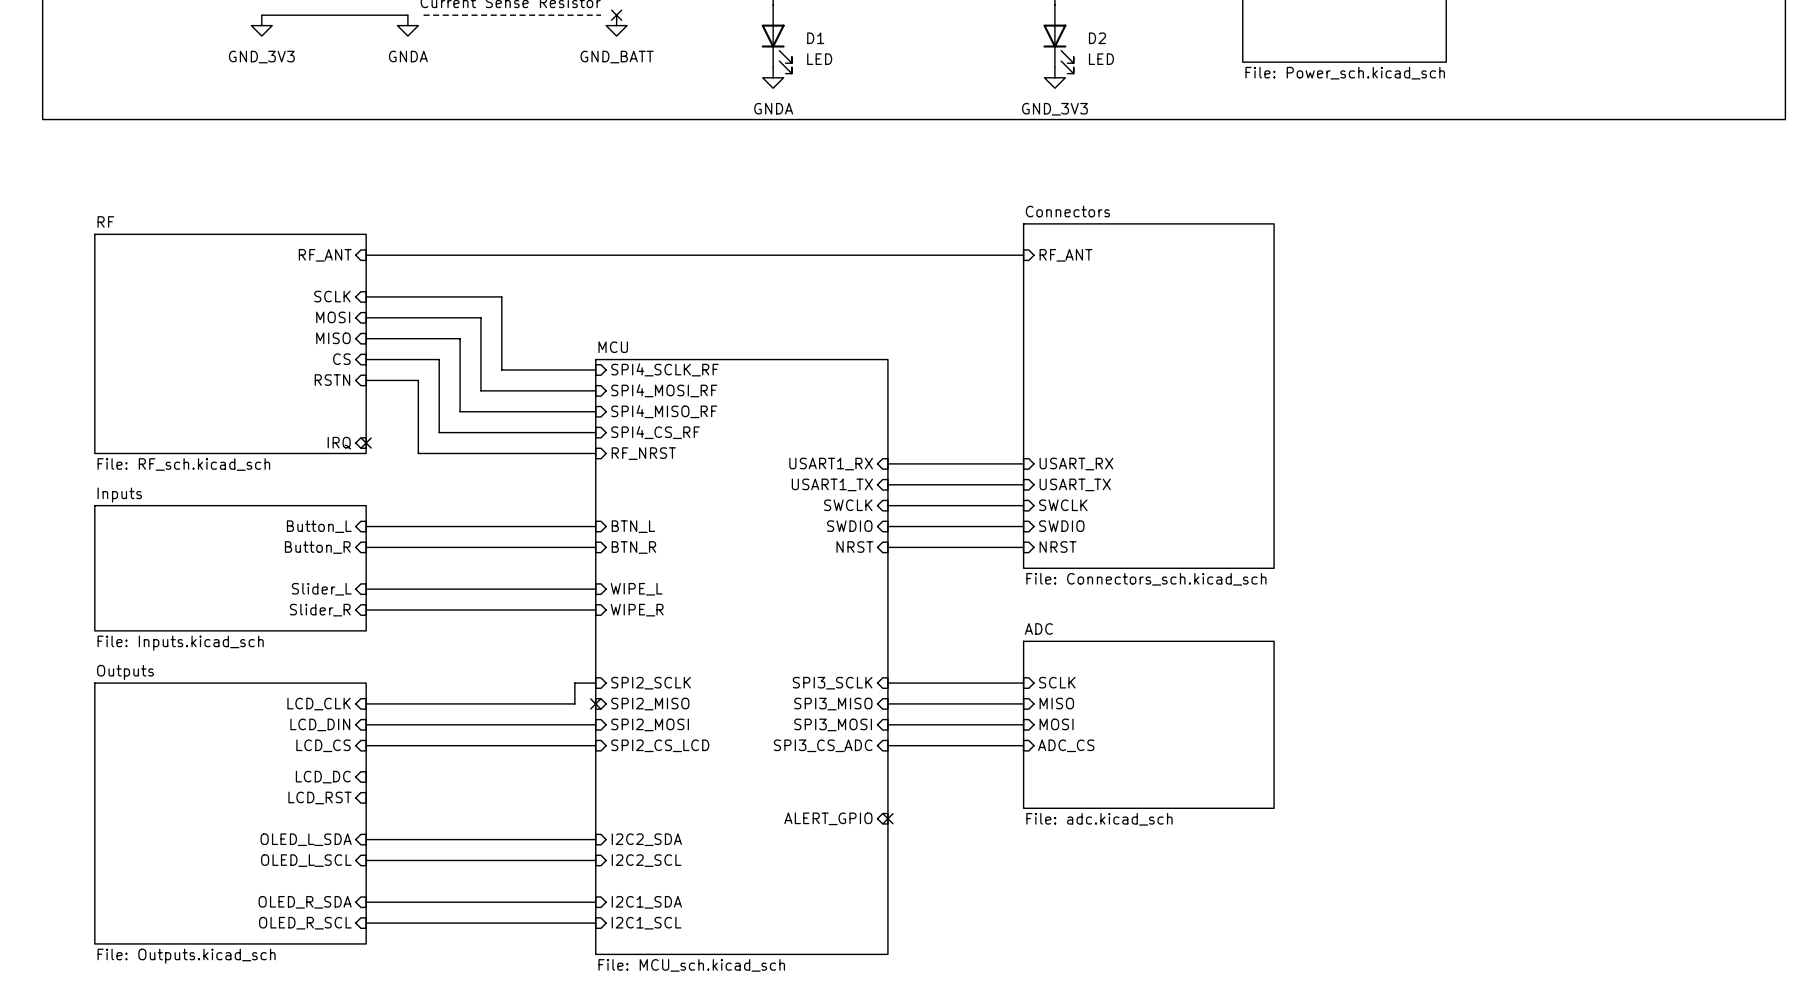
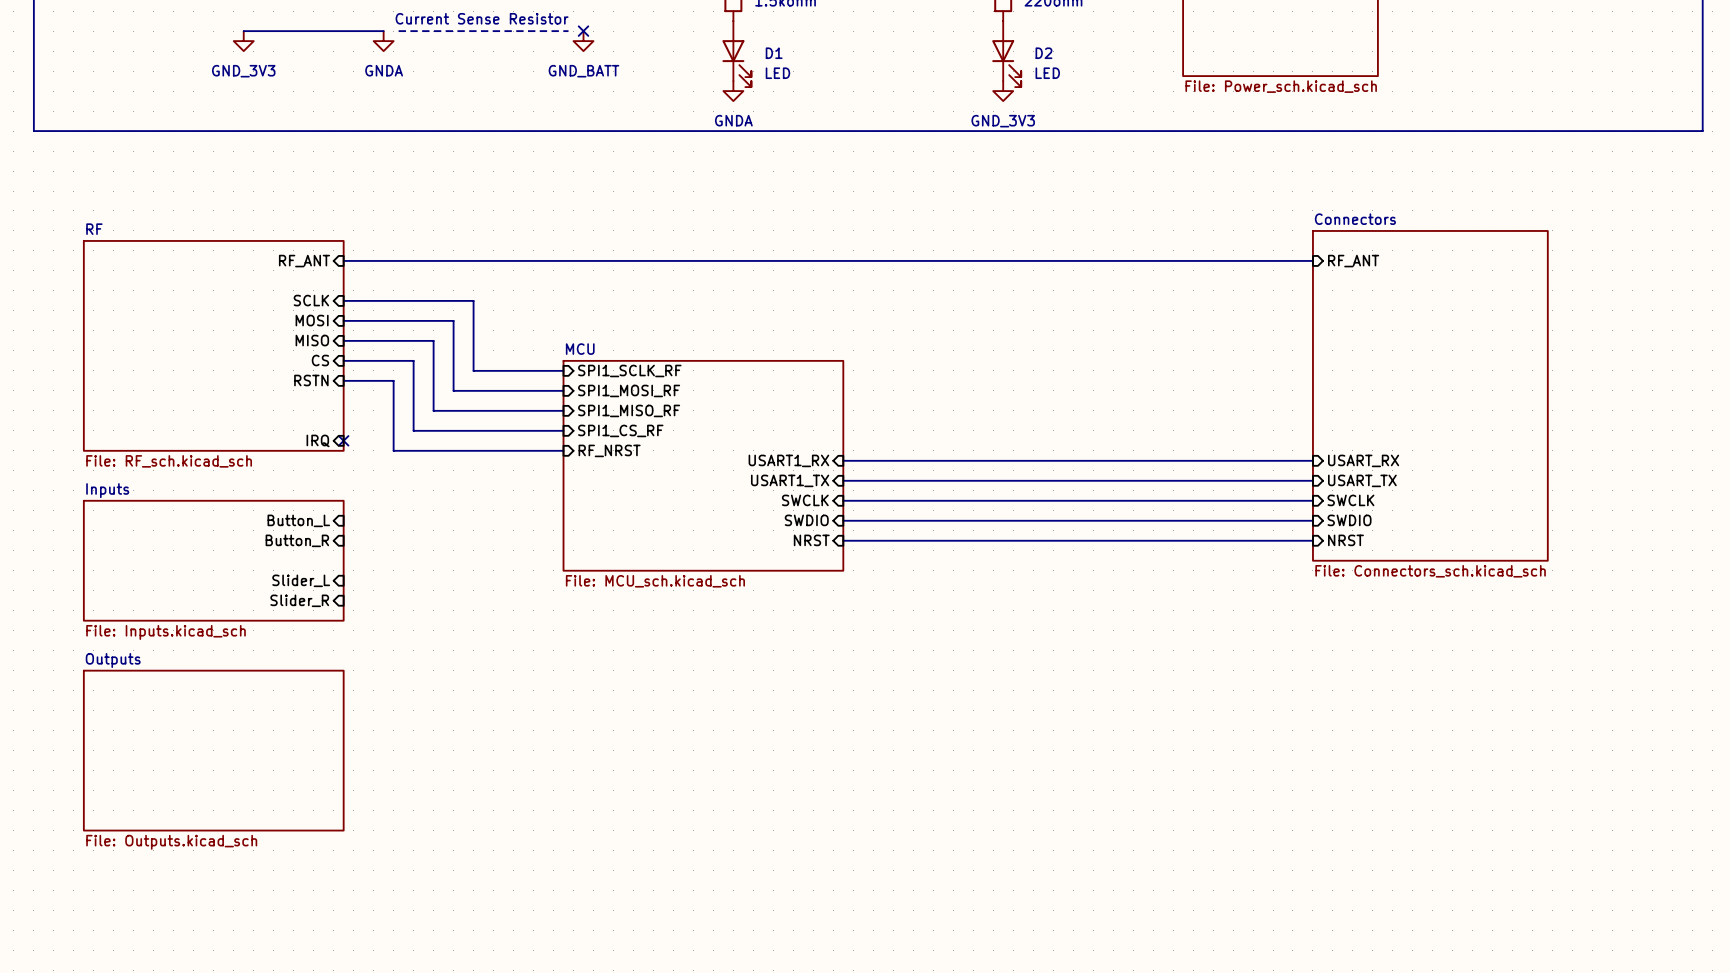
wire: none -> (973, 260) (1312, 260)
sheet pin: RF_ANT (1066, 255) -> none
sheet pin: none -> RF_ANT (1353, 261)
sheet pin: SPI4_SCLK_RF (664, 369) -> SPI1_SCLK_RF (629, 370)
sheet pin: SPI4_MOSI_RF (664, 390) -> SPI1_MOSI_RF (629, 390)
sheet Connectors: File: Connectors_sch.kicad_sch (1148, 396) -> none
sheet Connectors: none -> File: Connectors_sch.kicad_sch (1430, 395)
sheet pin: SPI4_MISO_RF (664, 411) -> SPI1_MISO_RF (629, 410)
sheet pin: SPI4_CS_RF (655, 432) -> SPI1_CS_RF (620, 430)
wire: none -> (973, 460) (1312, 460)
sheet pin: USART_RX (1076, 464) -> none
sheet pin: none -> USART_RX (1363, 460)
sheet MCU: none -> File: MCU_sch.kicad_sch (703, 465)
wire: none -> (973, 480) (1312, 480)
sheet pin: USART_TX (1075, 484) -> none
sheet pin: none -> USART_TX (1362, 480)
wire: none -> (973, 500) (1312, 500)
sheet pin: SWCLK (1063, 505) -> none
sheet pin: none -> SWCLK (1350, 500)
wire: (366, 526) (595, 526) -> none
sheet pin: BTN_L (633, 526) -> none
wire: none -> (973, 520) (1312, 520)
sheet pin: SWDIO (1061, 526) -> none
sheet pin: none -> SWDIO (1349, 520)
wire: (366, 547) (595, 547) -> none
sheet pin: BTN_R (633, 547) -> none
wire: none -> (973, 540) (1312, 540)
sheet pin: NRST (1058, 547) -> none
sheet pin: none -> NRST (1345, 540)
wire: (366, 589) (595, 589) -> none
sheet pin: WIPE_L (636, 589) -> none
wire: (366, 610) (595, 610) -> none
sheet pin: WIPE_R (637, 610) -> none
sheet MCU: File: MCU_sch.kicad_sch (741, 656) -> none
sheet pin: SCLK (1057, 682) -> none
wire: (595, 683) (574, 683) (574, 703) (366, 703) -> none
sheet pin: SPI2_SCLK (651, 683) -> none
sheet pin: SPI3_SCLK (832, 683) -> none
wire: (887, 683) (1023, 683) -> none
no-connect mark: (595, 703) -> none
wire: (887, 703) (1023, 703) -> none
sheet pin: MISO (1056, 703) -> none
sheet pin: LCD_CLK (319, 704) -> none
sheet pin: SPI2_MISO (650, 704) -> none
sheet pin: SPI3_MISO (833, 704) -> none
sheet pin: LCD_DIN (320, 724) -> none
wire: (366, 724) (595, 724) -> none
sheet pin: SPI2_MOSI (650, 724) -> none
sheet pin: SPI3_MOSI (833, 724) -> none
wire: (887, 724) (1023, 724) -> none
sheet pin: MOSI (1056, 724) -> none
sheet ADC: File: adc.kicad_sch (1148, 724) -> none
sheet pin: LCD_CS (323, 745) -> none
wire: (366, 745) (595, 745) -> none
sheet pin: SPI2_CS_LCD (660, 745) -> none
sheet pin: SPI3_CS_ADC (823, 745) -> none
wire: (887, 745) (1023, 745) -> none
sheet pin: ADC_CS (1066, 745) -> none
sheet Outputs: none -> File: Outputs.kicad_sch (213, 750)
sheet pin: LCD_DC (323, 777) -> none
sheet pin: LCD_RST (320, 797) -> none
sheet Outputs: File: Outputs.kicad_sch (230, 813) -> none
sheet pin: ALERT_GPIO (828, 818) -> none
no-connect mark: (887, 818) -> none
sheet pin: OLED_L_SDA (306, 839) -> none
wire: (366, 839) (595, 839) -> none
sheet pin: I2C2_SDA (646, 839) -> none
sheet pin: OLED_L_SCL (306, 860) -> none
wire: (366, 860) (595, 860) -> none
sheet pin: I2C2_SCL (646, 860) -> none
sheet pin: OLED_R_SDA (305, 902) -> none
wire: (366, 902) (595, 902) -> none
sheet pin: I2C1_SDA (646, 902) -> none
sheet pin: OLED_R_SCL (305, 923) -> none
wire: (366, 923) (595, 923) -> none
sheet pin: I2C1_SCL (646, 923) -> none

